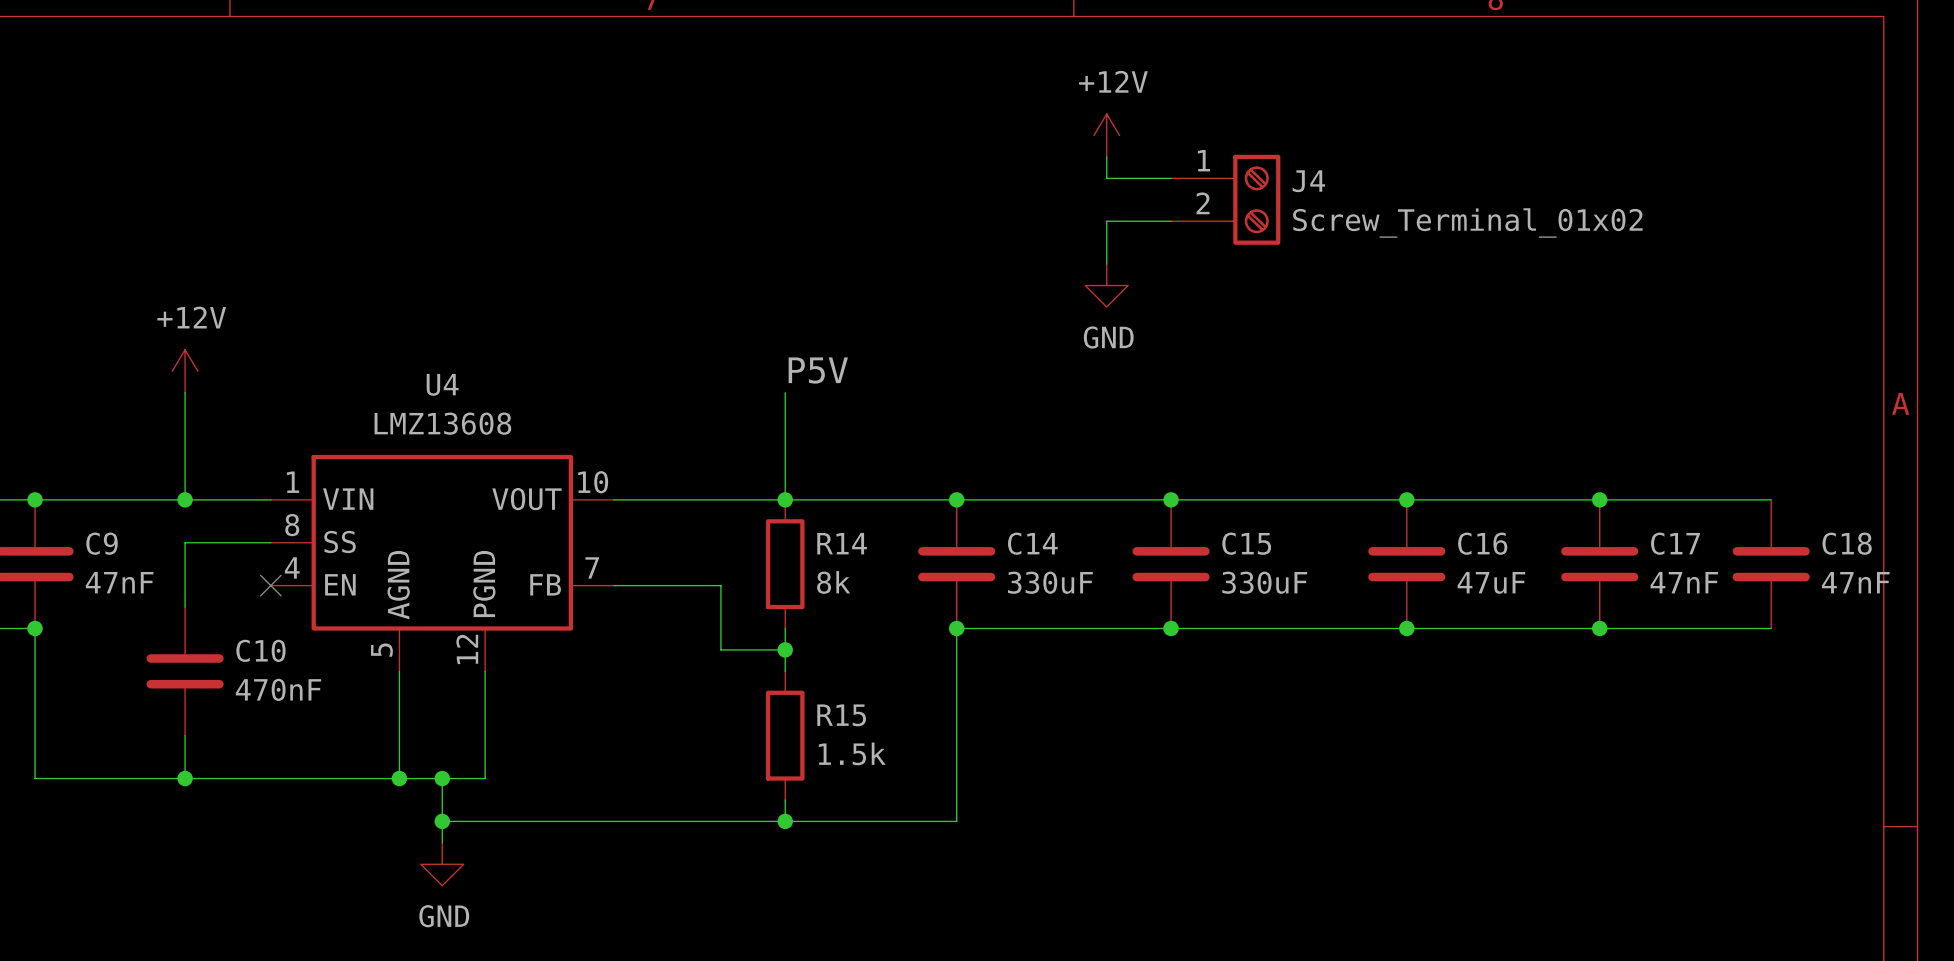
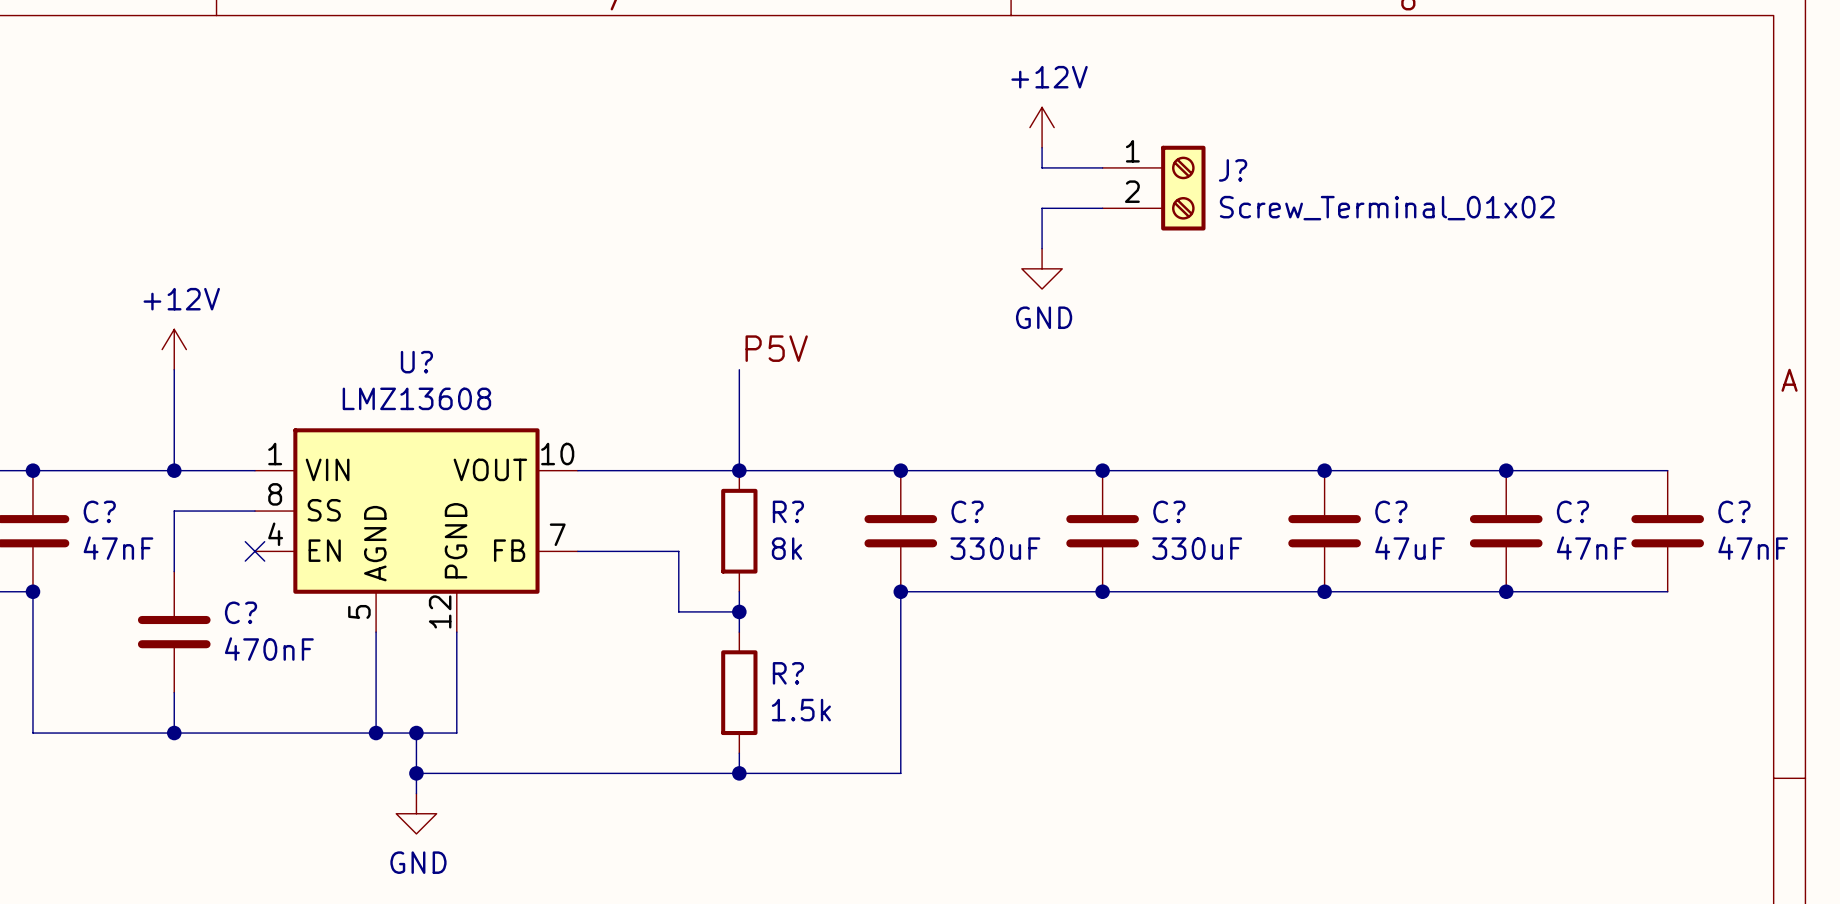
J4 name: J4 (1308, 181) -> J? (1233, 170)
U4 name: U4 (442, 384) -> U? (416, 362)
C9 name: C9 (102, 543) -> C? (99, 511)
R14 name: R14 (842, 543) -> R? (788, 511)
C14 name: C14 (1032, 543) -> C? (967, 511)
C15 name: C15 (1246, 543) -> C? (1169, 511)
C16 name: C16 (1482, 543) -> C? (1391, 511)
C17 name: C17 (1675, 543) -> C? (1572, 511)
C18 name: C18 (1847, 543) -> C? (1734, 511)
C10 name: C10 (260, 650) -> C? (241, 612)
R15 name: R15 (841, 715) -> R? (788, 673)

